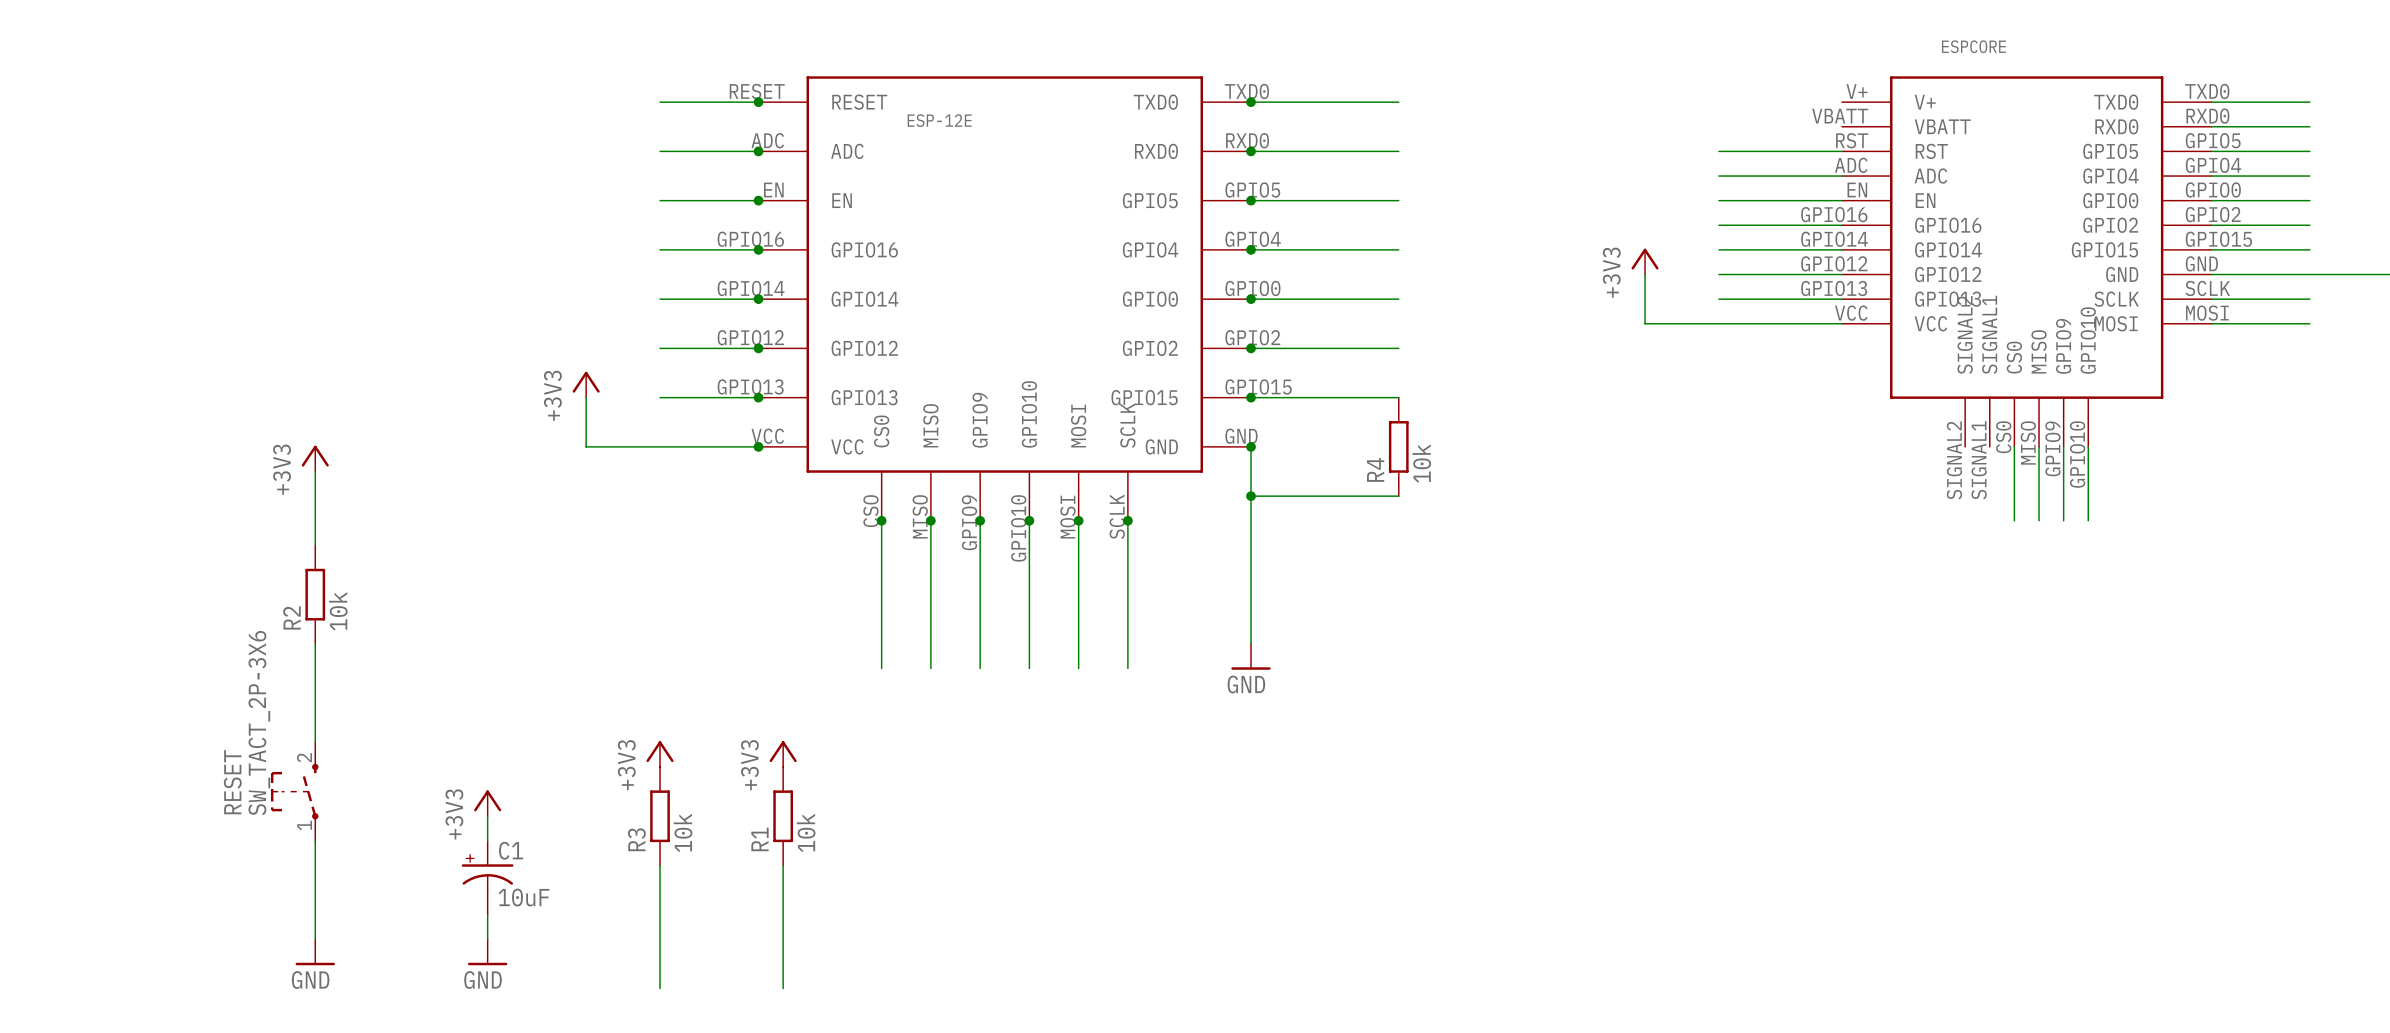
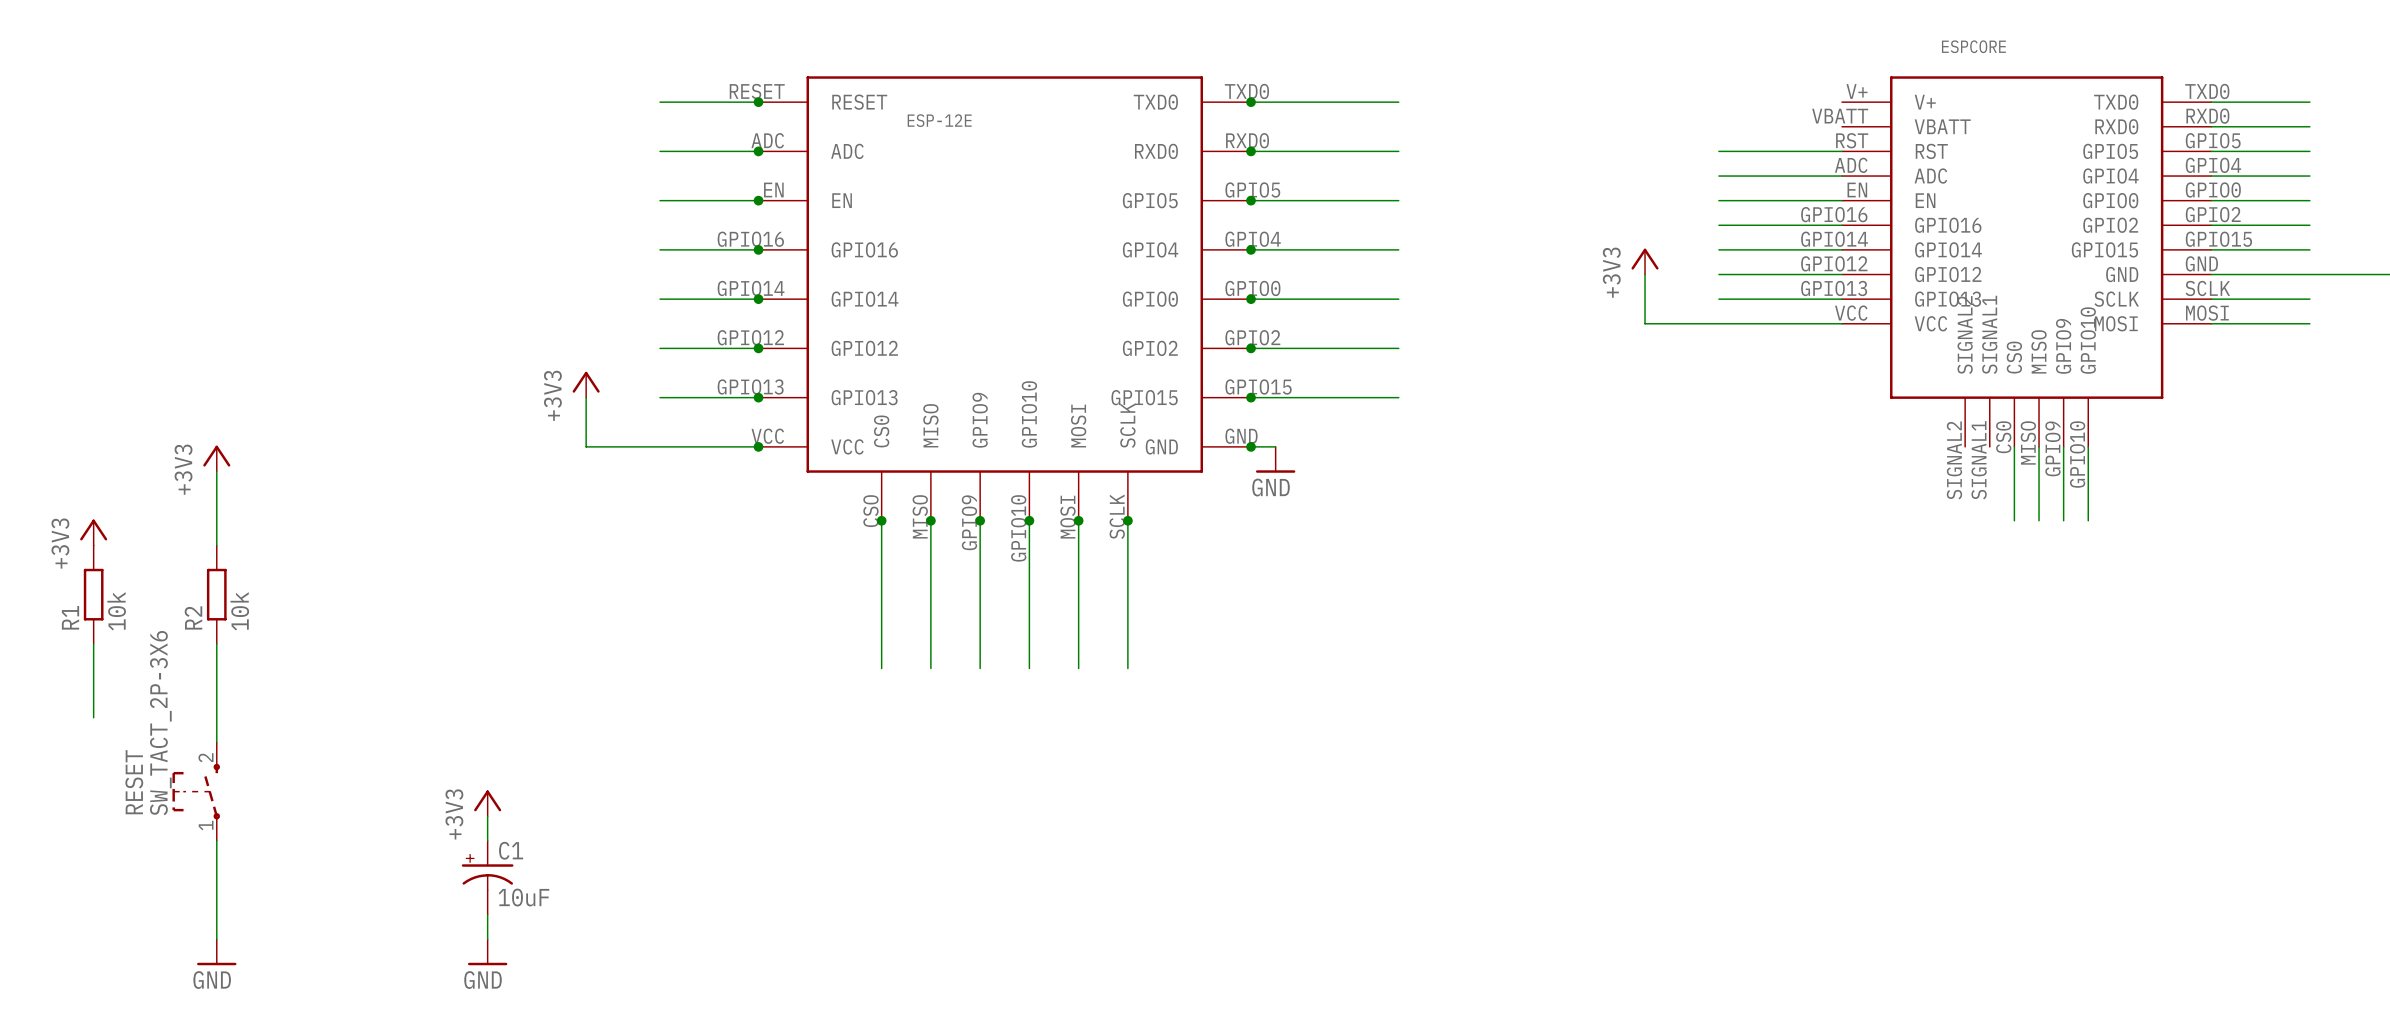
wire: (1251, 446) (1251, 643) -> (1251, 446) (1275, 446)
R4: 10k (1398, 446) -> none
power symbol position: +3V3 (315, 458) -> +3V3 (216, 458)
wire: (315, 471) (315, 545) -> (216, 471) (216, 545)
wire: (1251, 496) (1398, 496) -> none
junction: (1251, 496) -> none
power symbol: none -> +3V3 (93, 532)
R2 position: (315, 594) -> (216, 594)
wire: none -> (93, 643) (93, 717)
wire: (315, 643) (315, 742) -> (216, 643) (216, 742)
power symbol position: GND (1251, 656) -> GND (1275, 459)
power symbol: +3V3 (660, 754) -> none
power symbol: +3V3 (783, 754) -> none
RESET position: (294, 791) -> (196, 791)
R3: 10k (660, 816) -> none
R1 position: (783, 816) -> (93, 594)
wire: (315, 840) (315, 939) -> (216, 840) (216, 939)
wire: (660, 865) (660, 988) -> none
wire: (783, 865) (783, 988) -> none
power symbol position: GND (315, 952) -> GND (216, 952)

